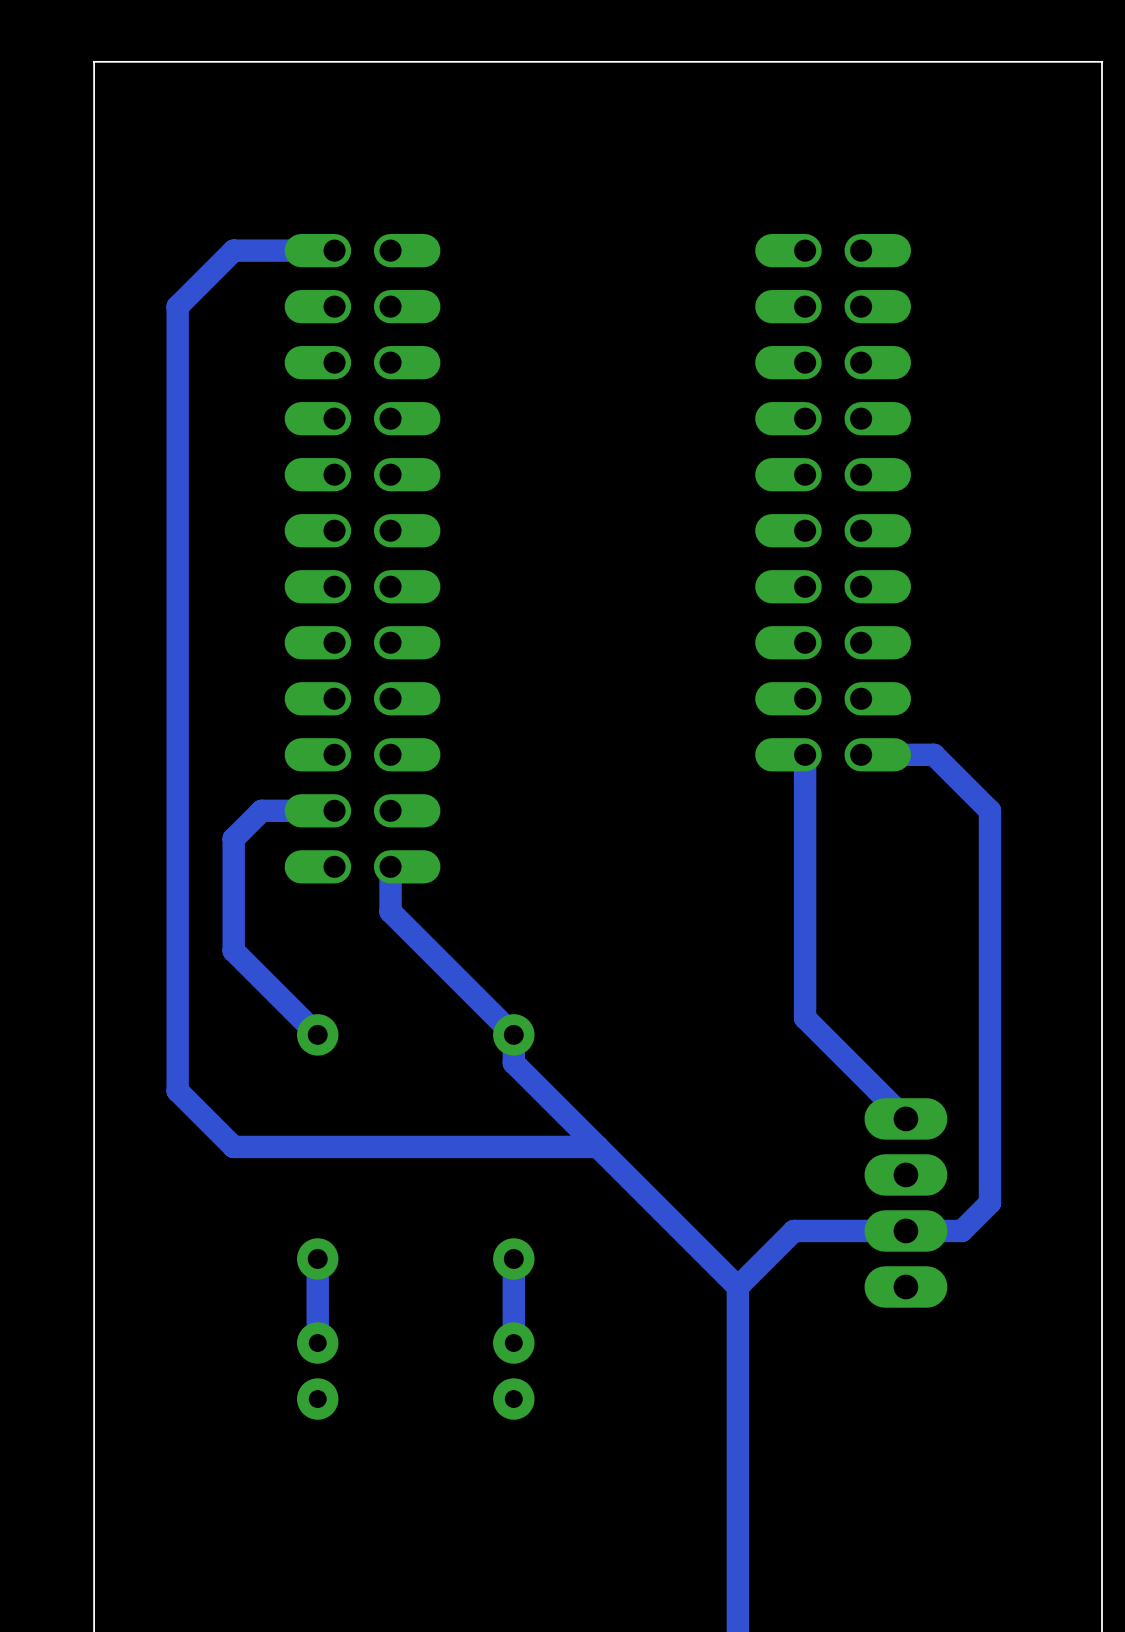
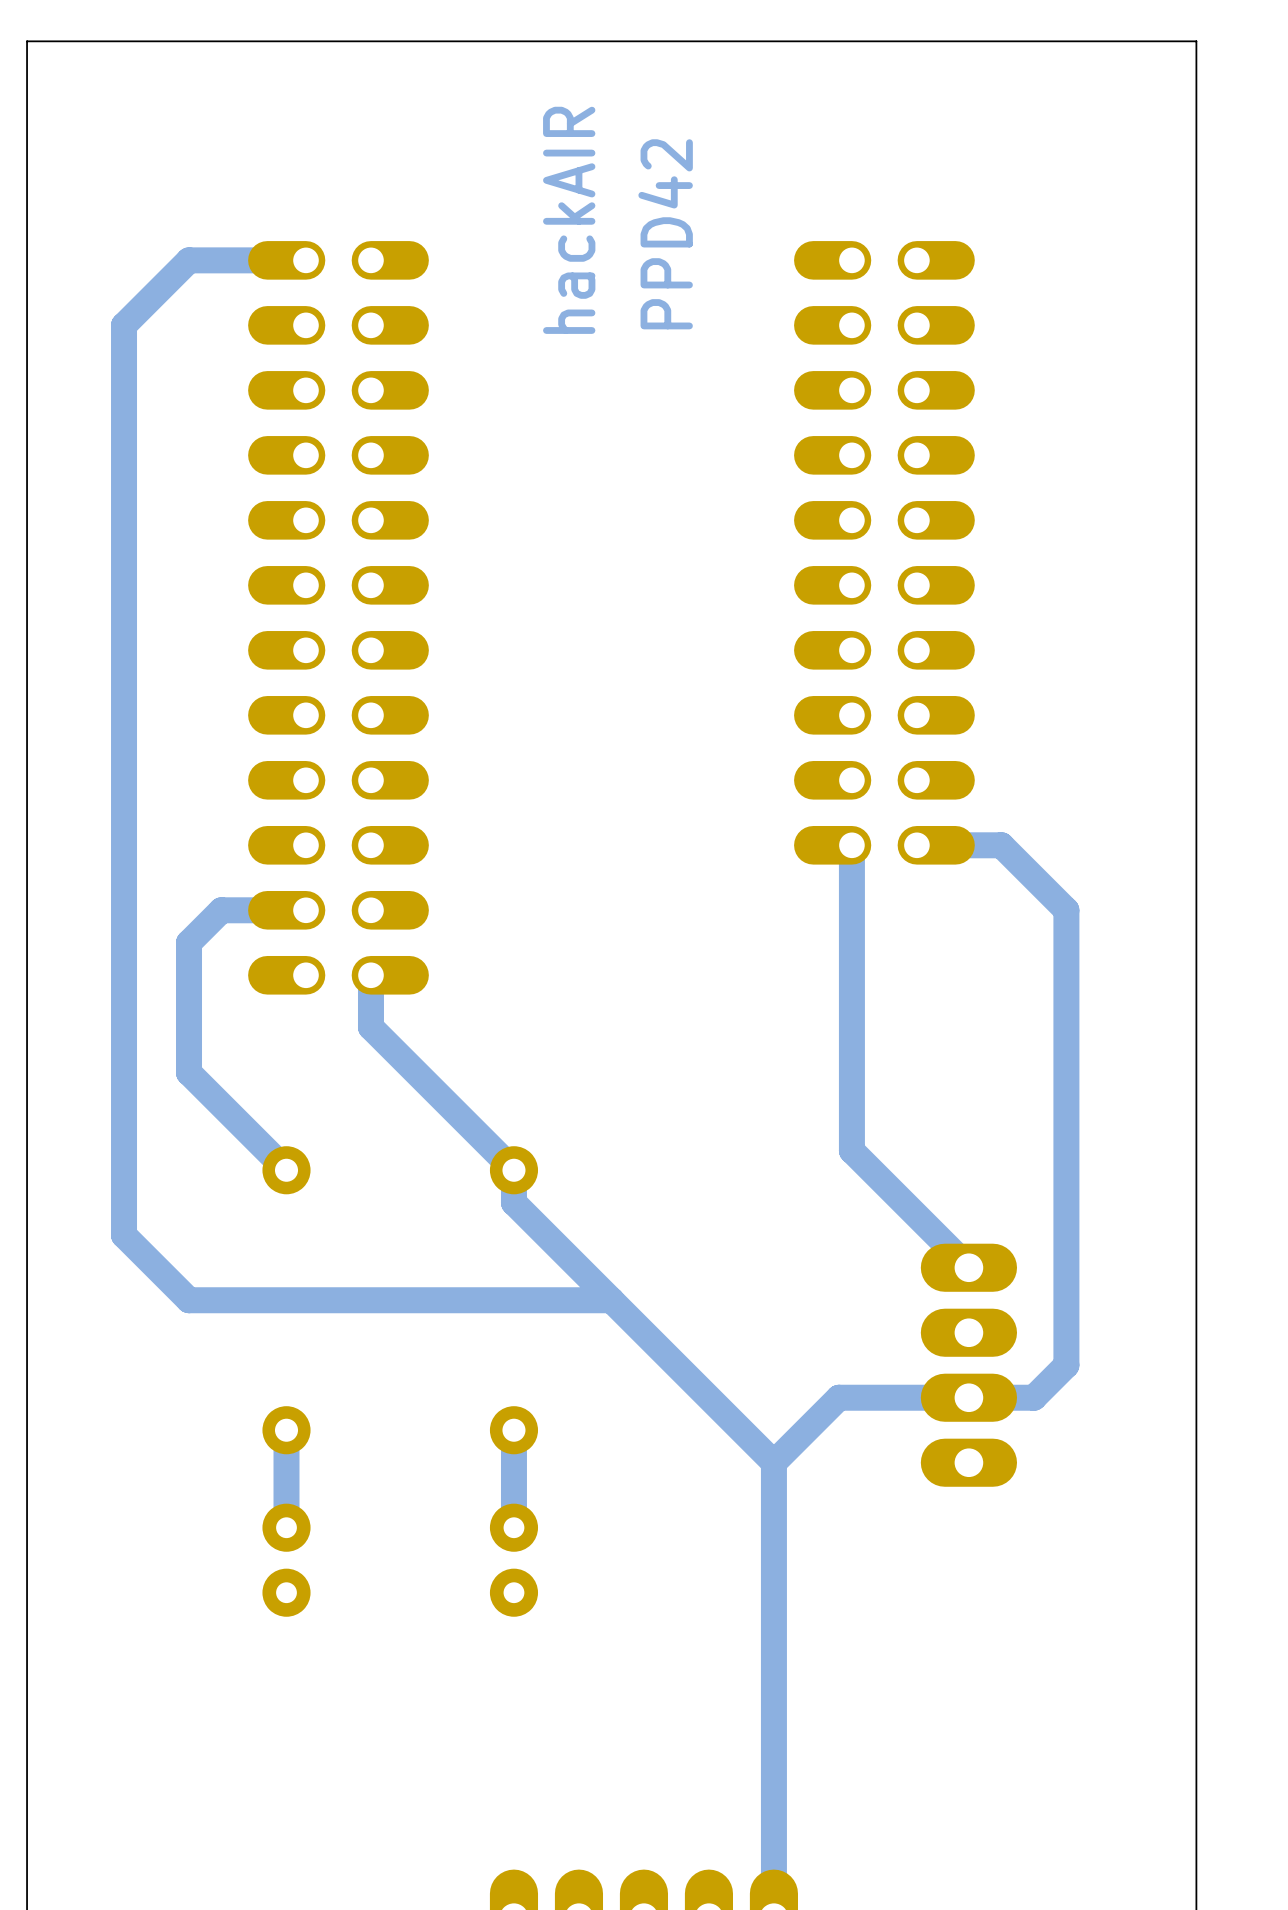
text: none -> hackAIR (569, 220)
text: none -> PPD42 (665, 234)

